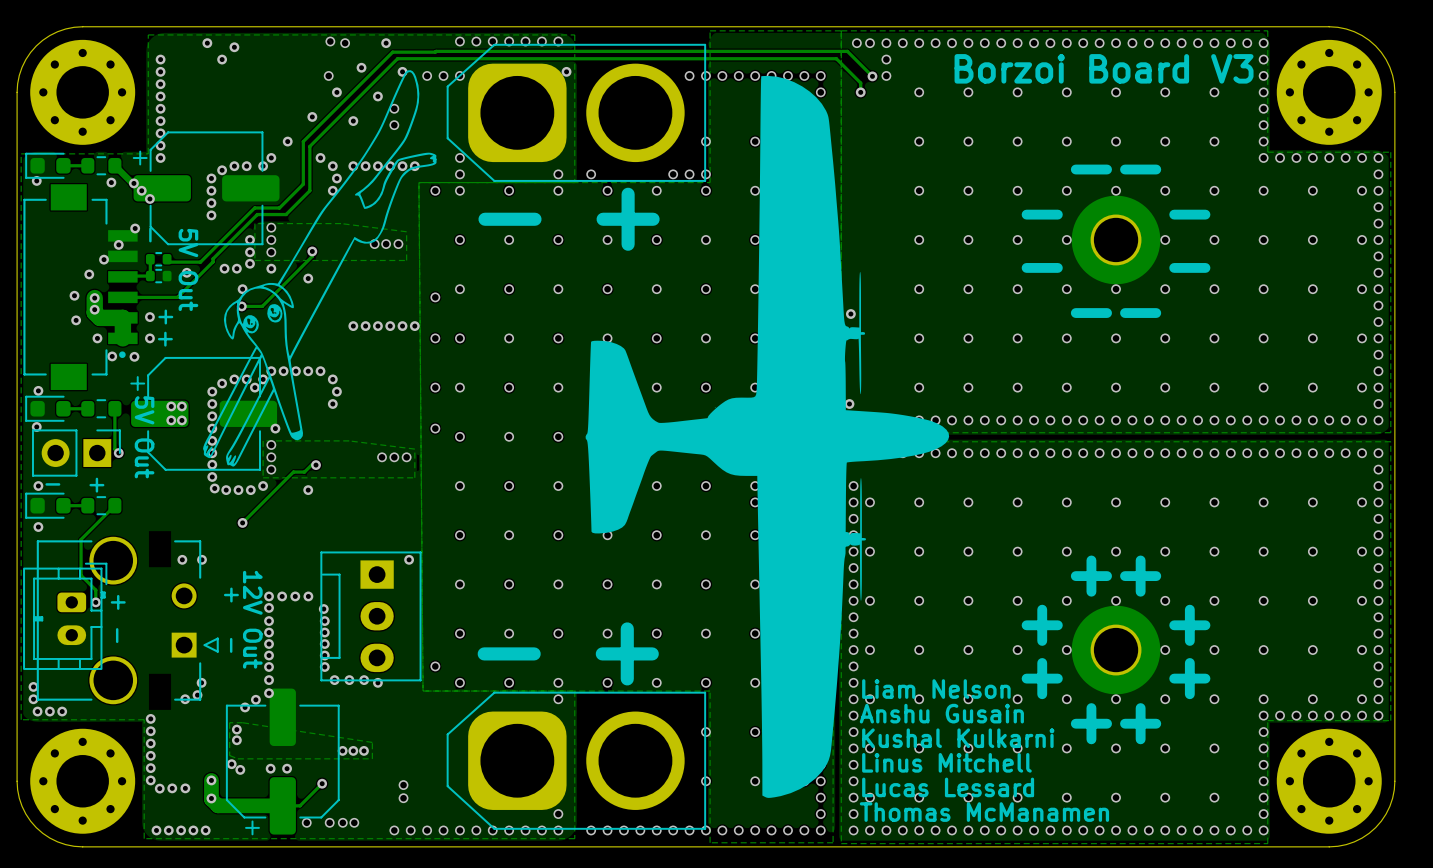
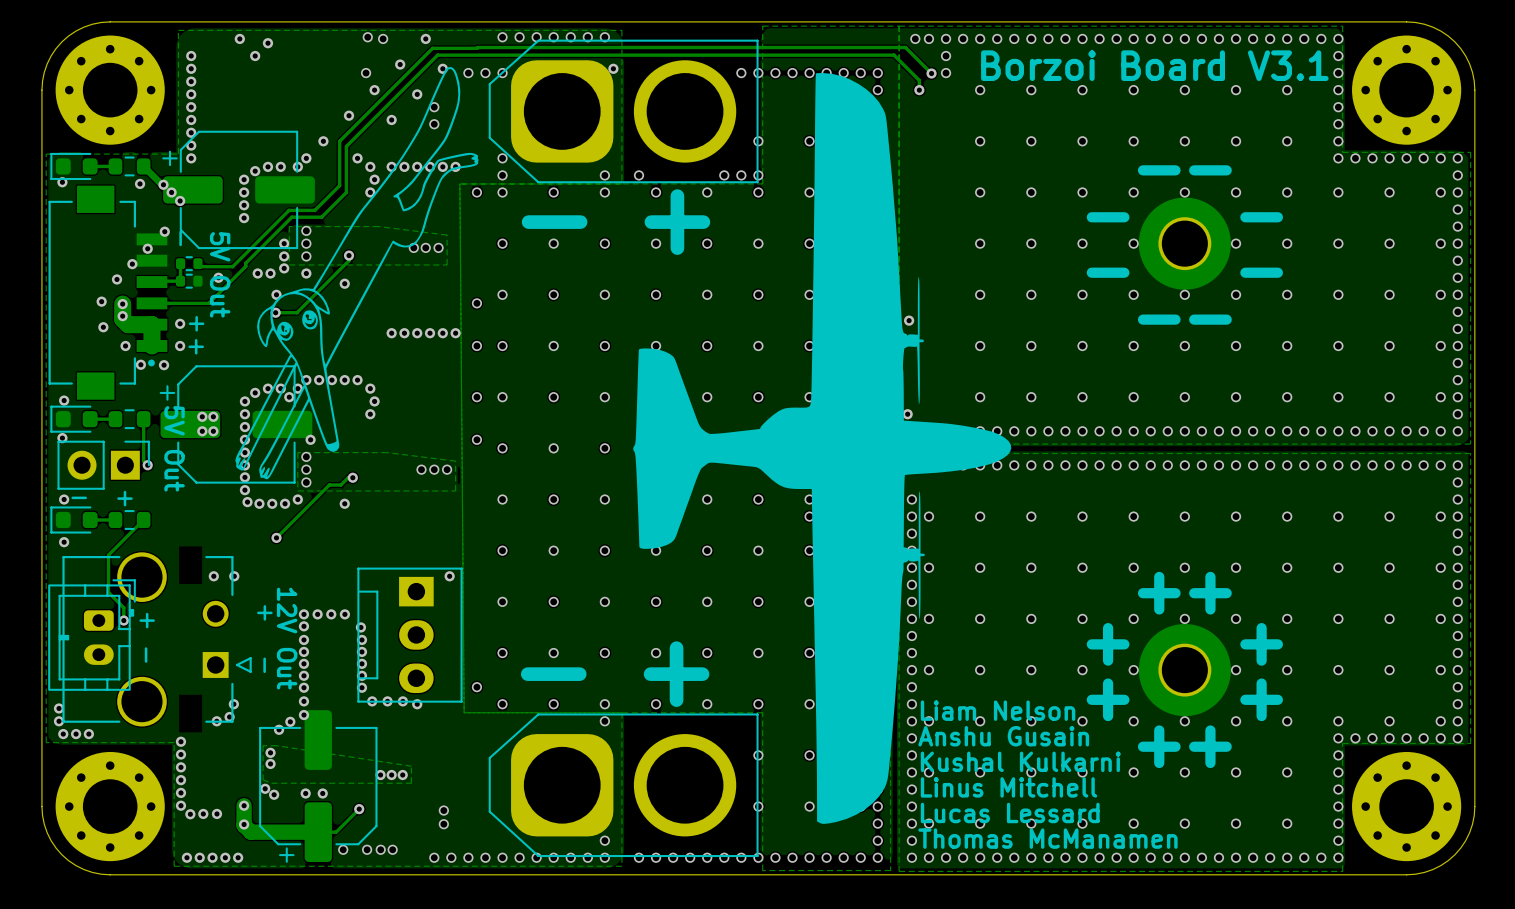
text: Borzoi Board V3 (1104, 68) -> Borzoi Board V3.1 (1154, 65)

